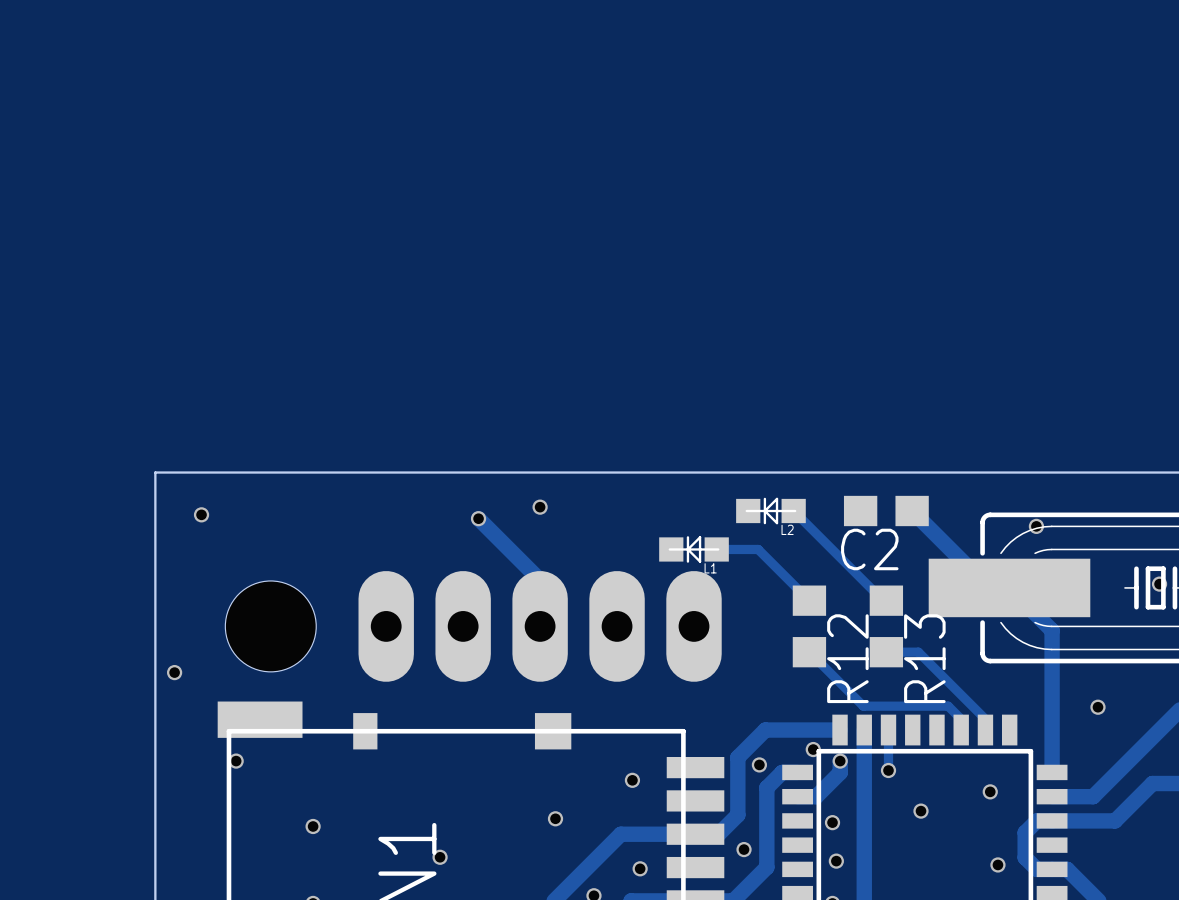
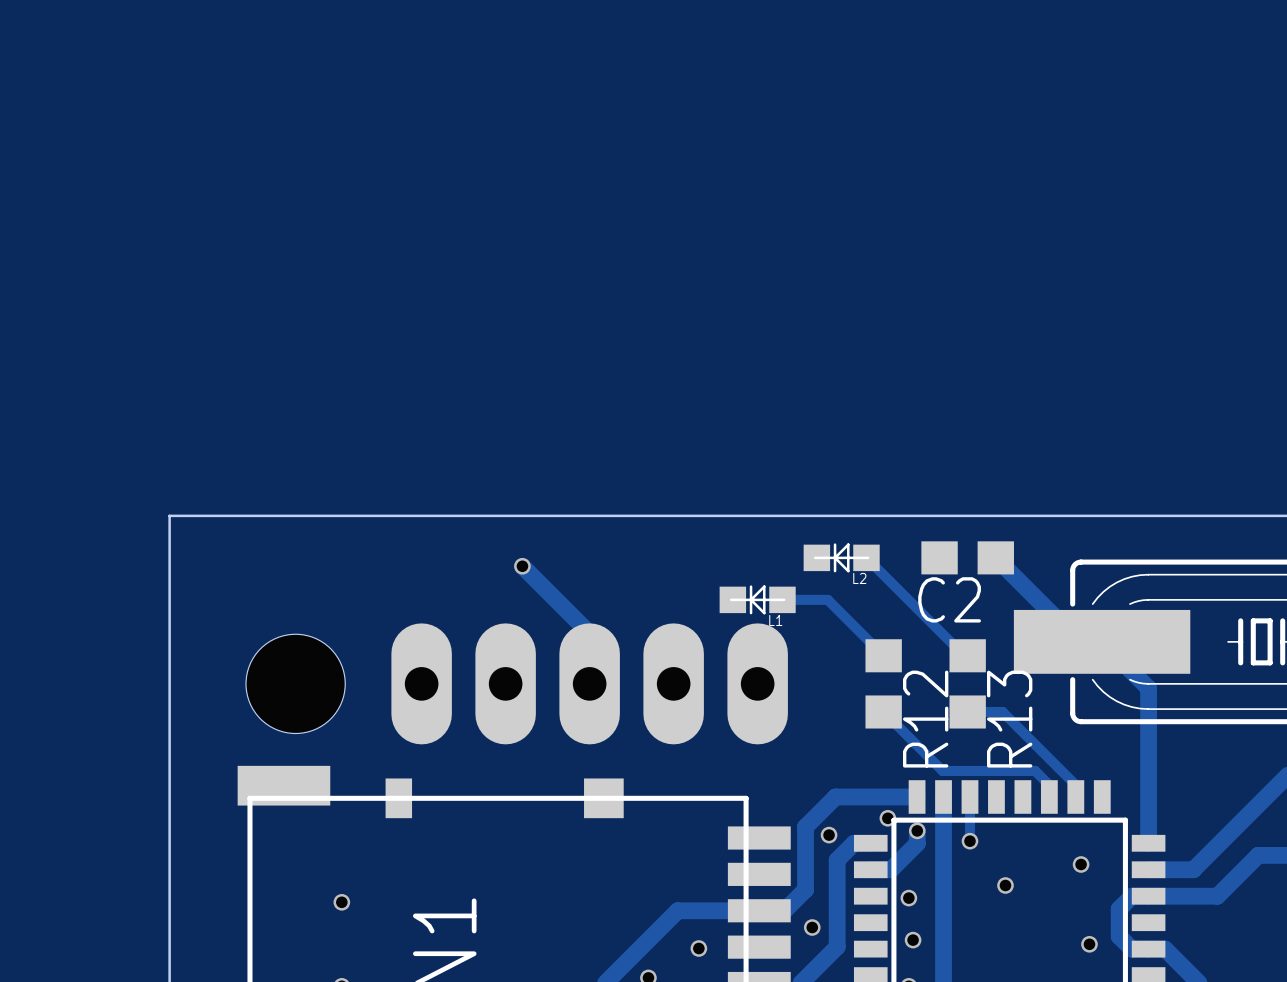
via: (540, 507) -> none
via: (201, 514) -> none
via: (1036, 526) -> none
via: (1159, 584) -> none
via: (174, 672) -> none
via: (1097, 707) -> none
via: (236, 761) -> none
via: (632, 780) -> none
via: (555, 818) -> none
via: (440, 857) -> none

